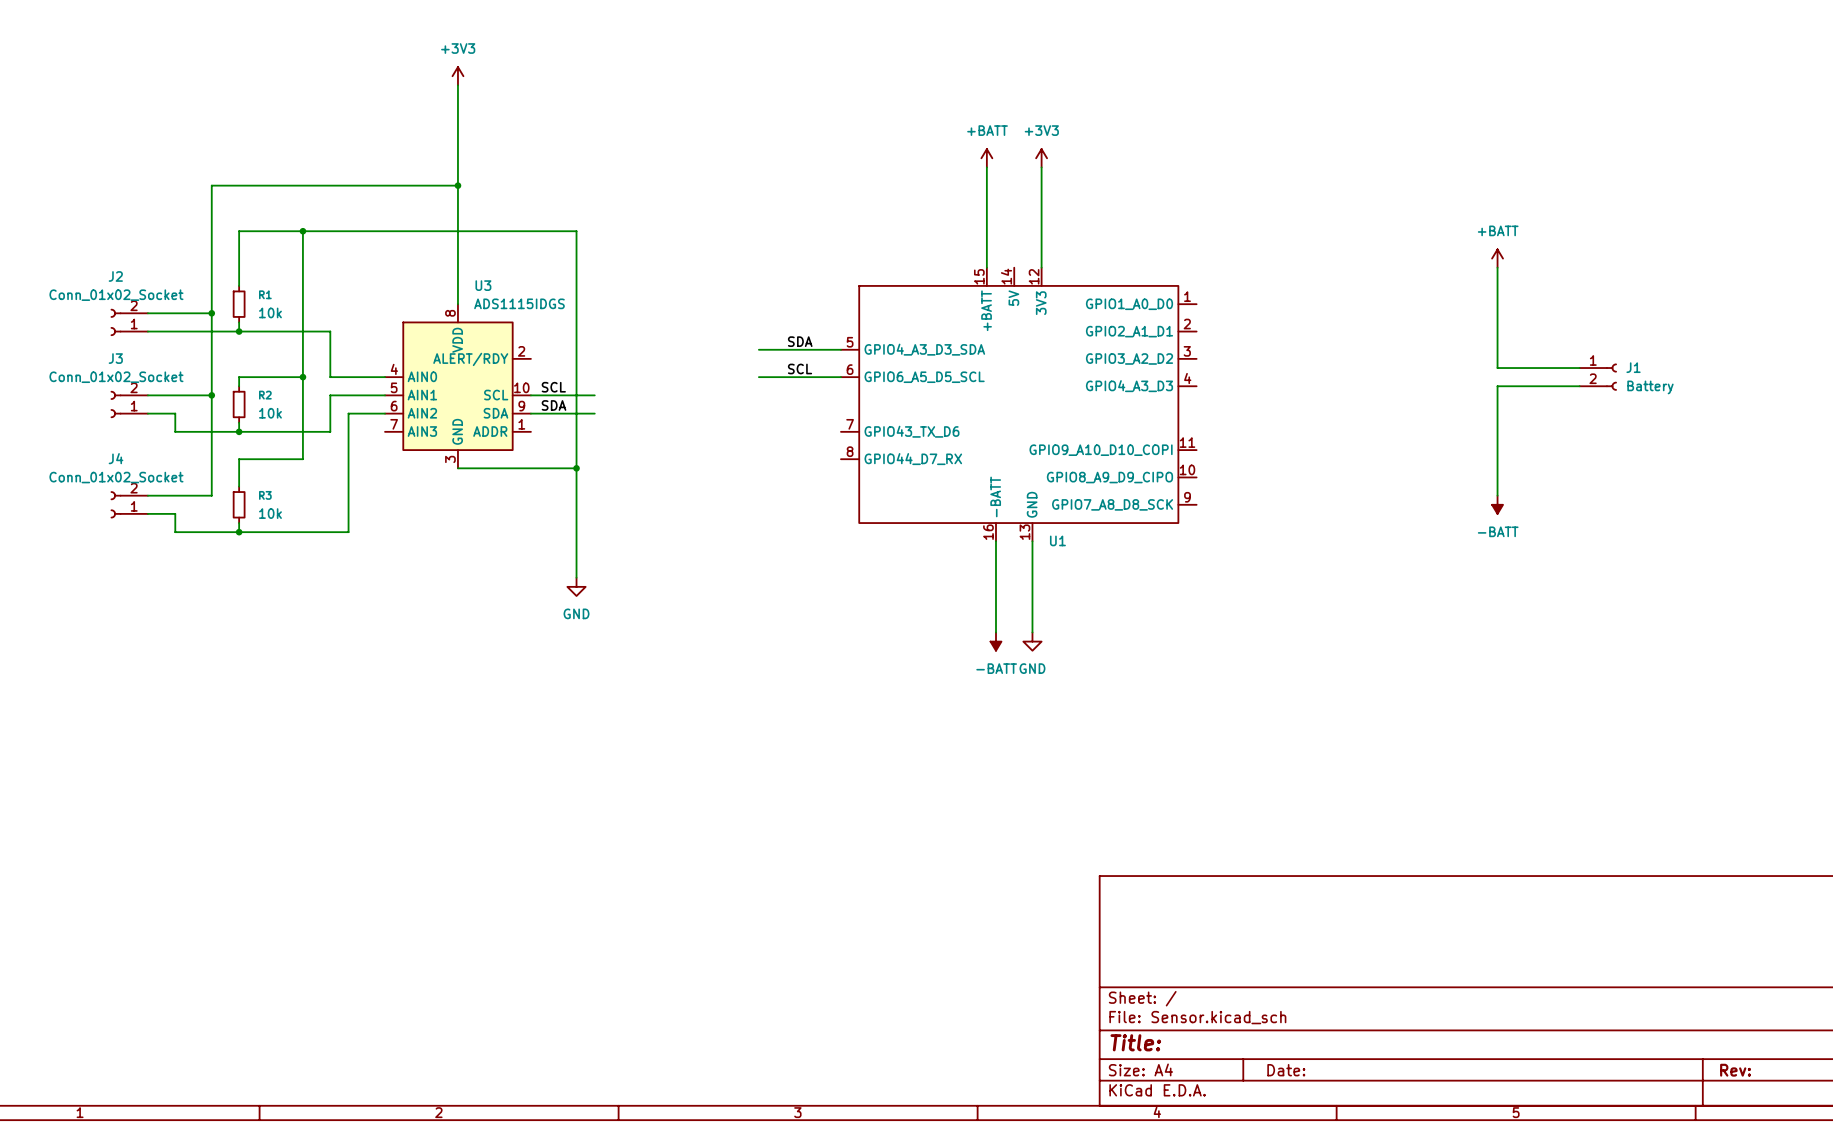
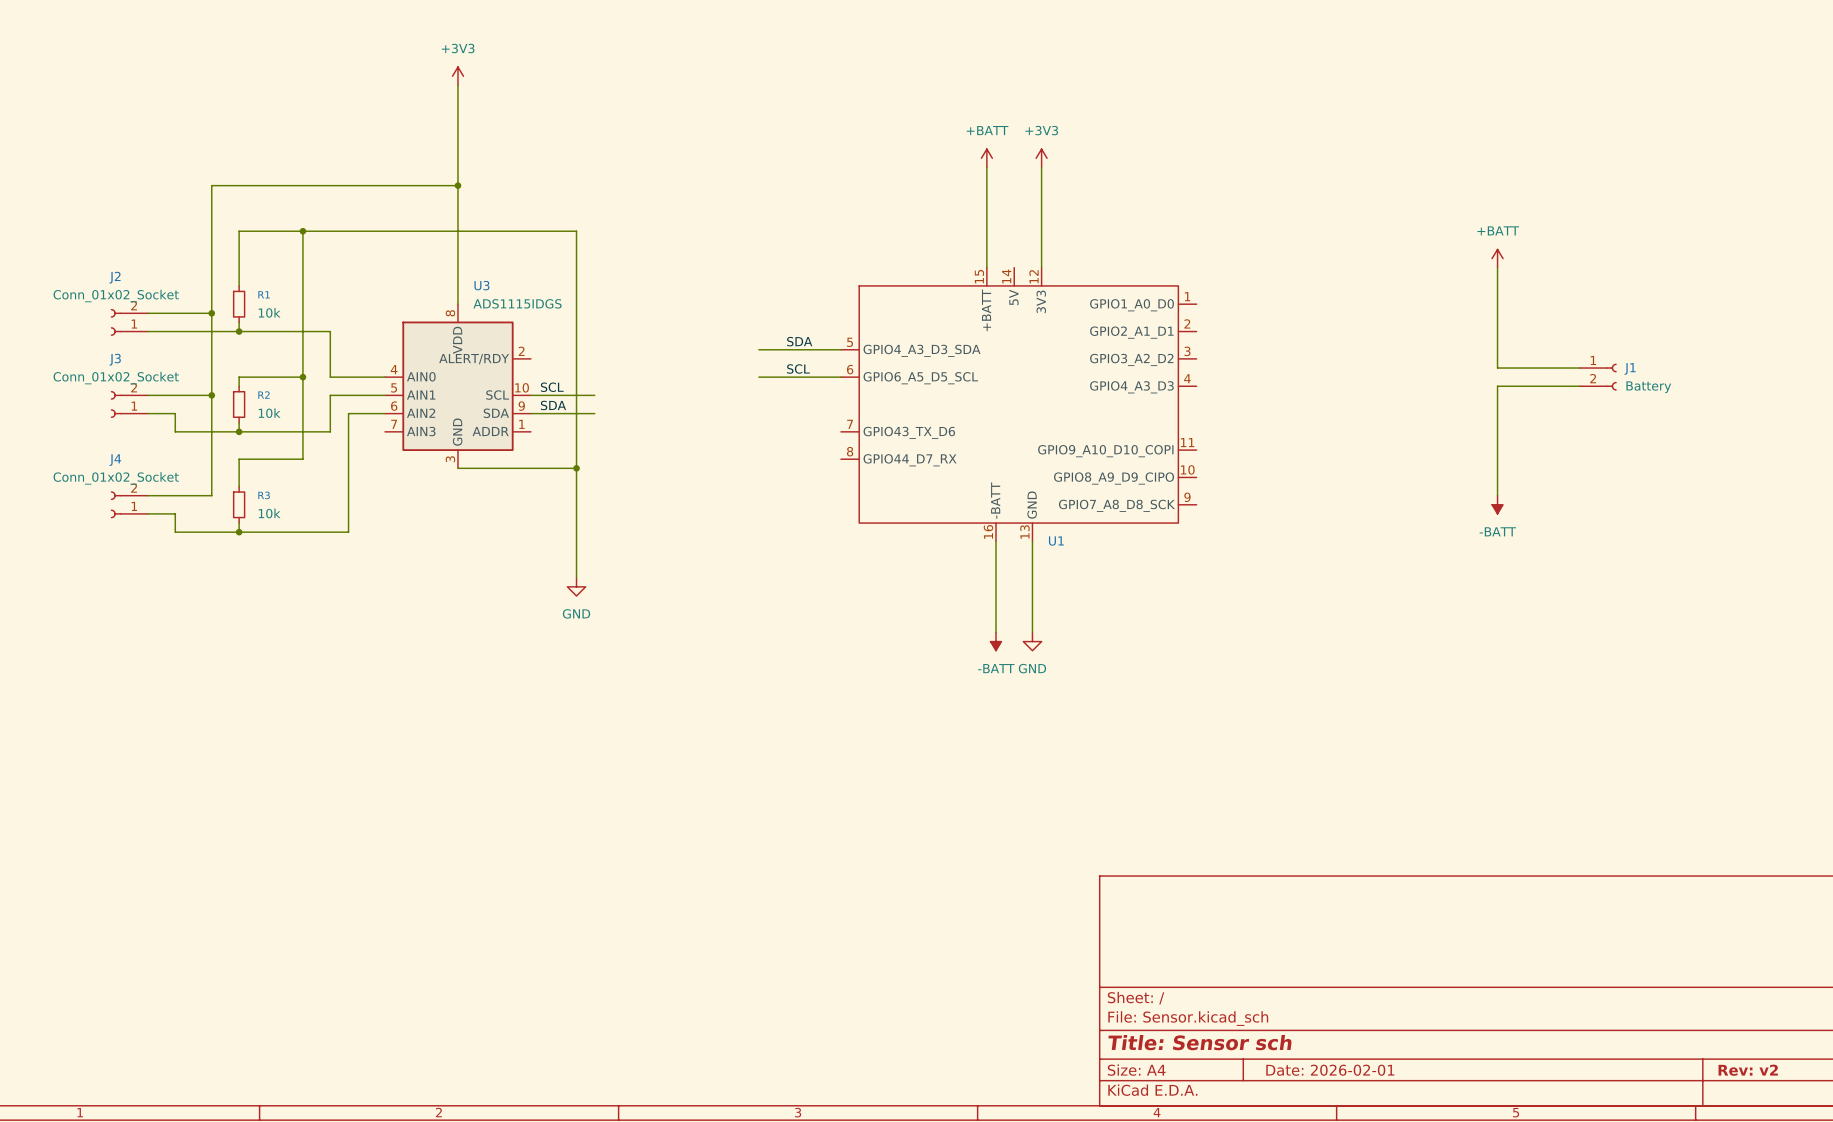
title block: Title: (1135, 1042) -> Title: Sensor sch (1200, 1042)
title block: Date: (1286, 1070) -> Date: 2026-02-01 (1330, 1070)
title block: Rev: (1735, 1070) -> Rev: v2 (1748, 1070)

